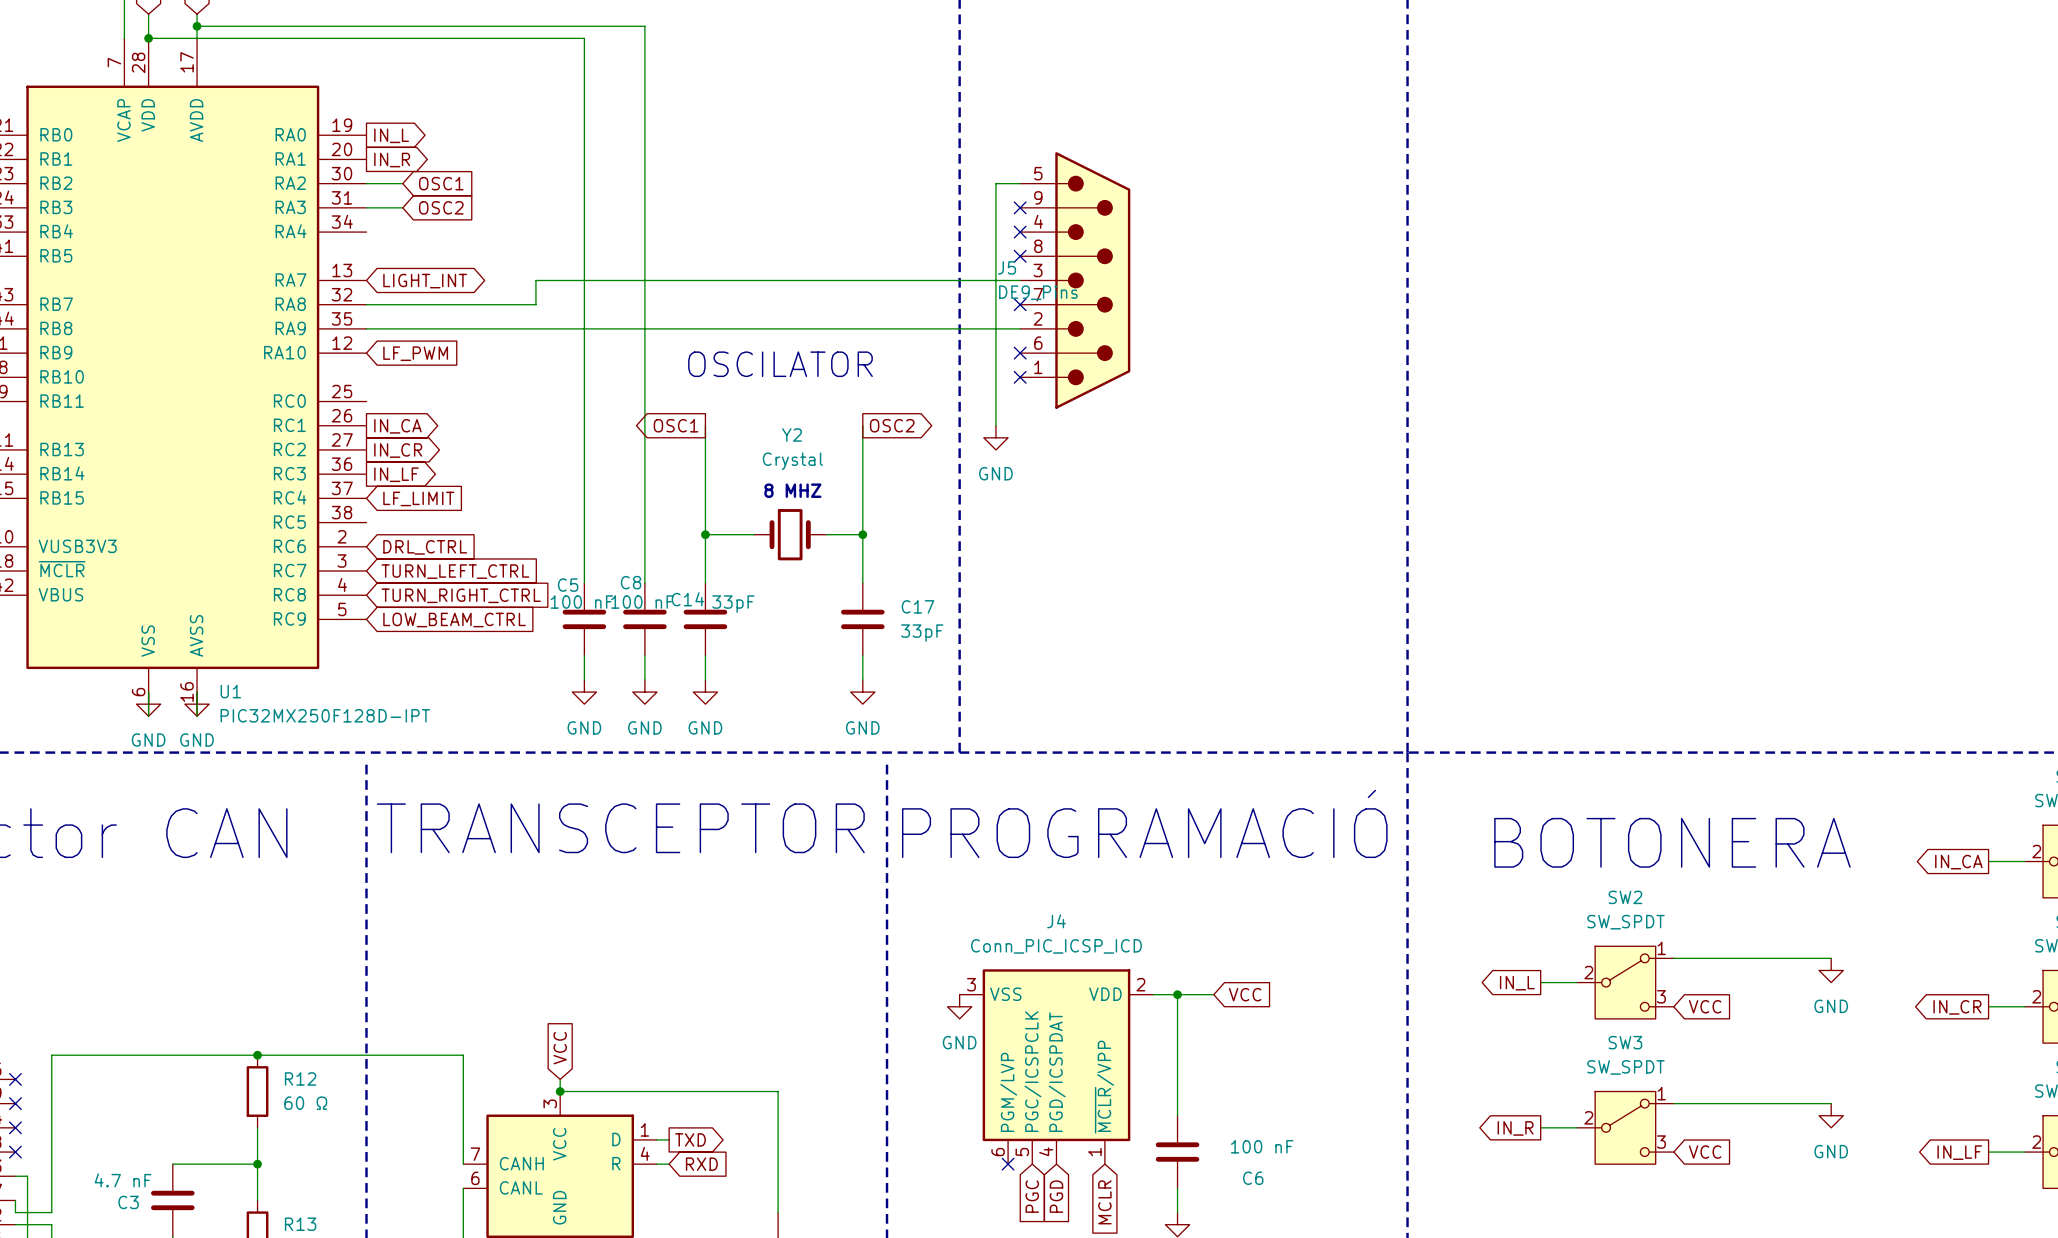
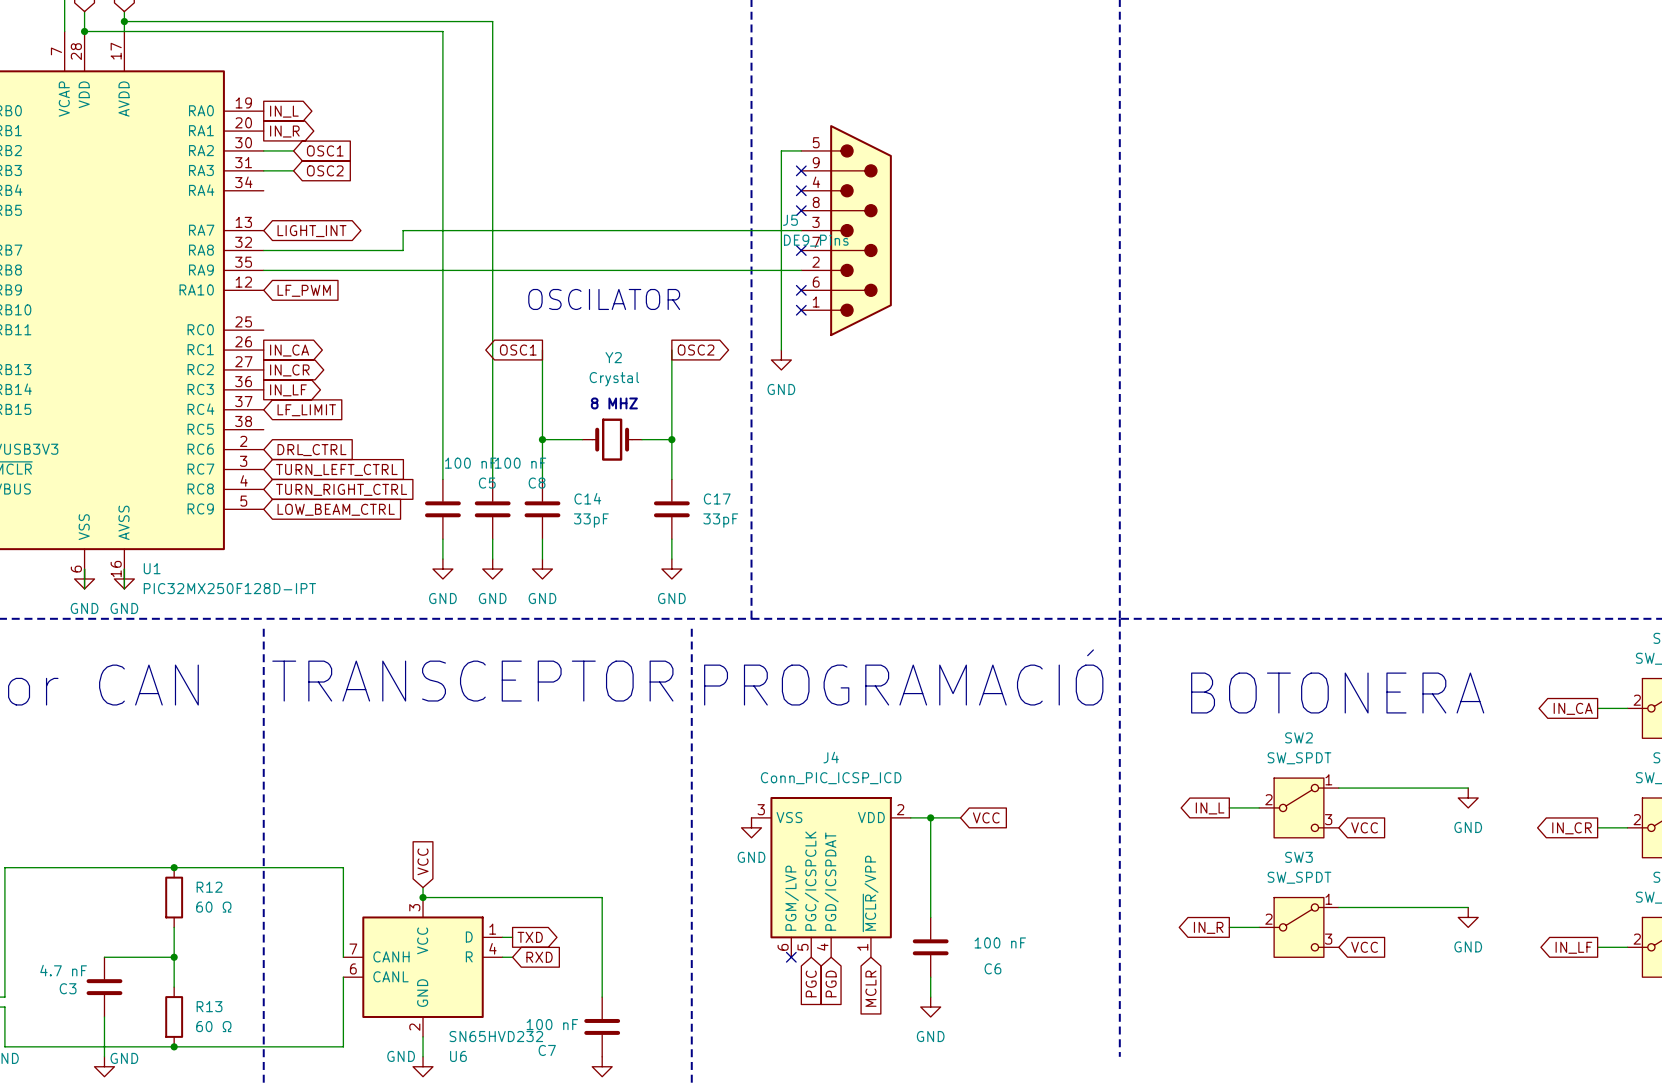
C8 name position: C8 (631, 582) -> C8 (537, 483)
C5 name position: C5 (568, 585) -> C5 (487, 483)
C14 name position: C14 (687, 599) -> C14 (587, 498)
C5 value position: 100 nF (581, 602) -> 100 nF (470, 463)
C8 value position: 100 nF (642, 602) -> 100 nF (520, 463)
C14 value position: 33pF (733, 604) -> 33pF (591, 520)

